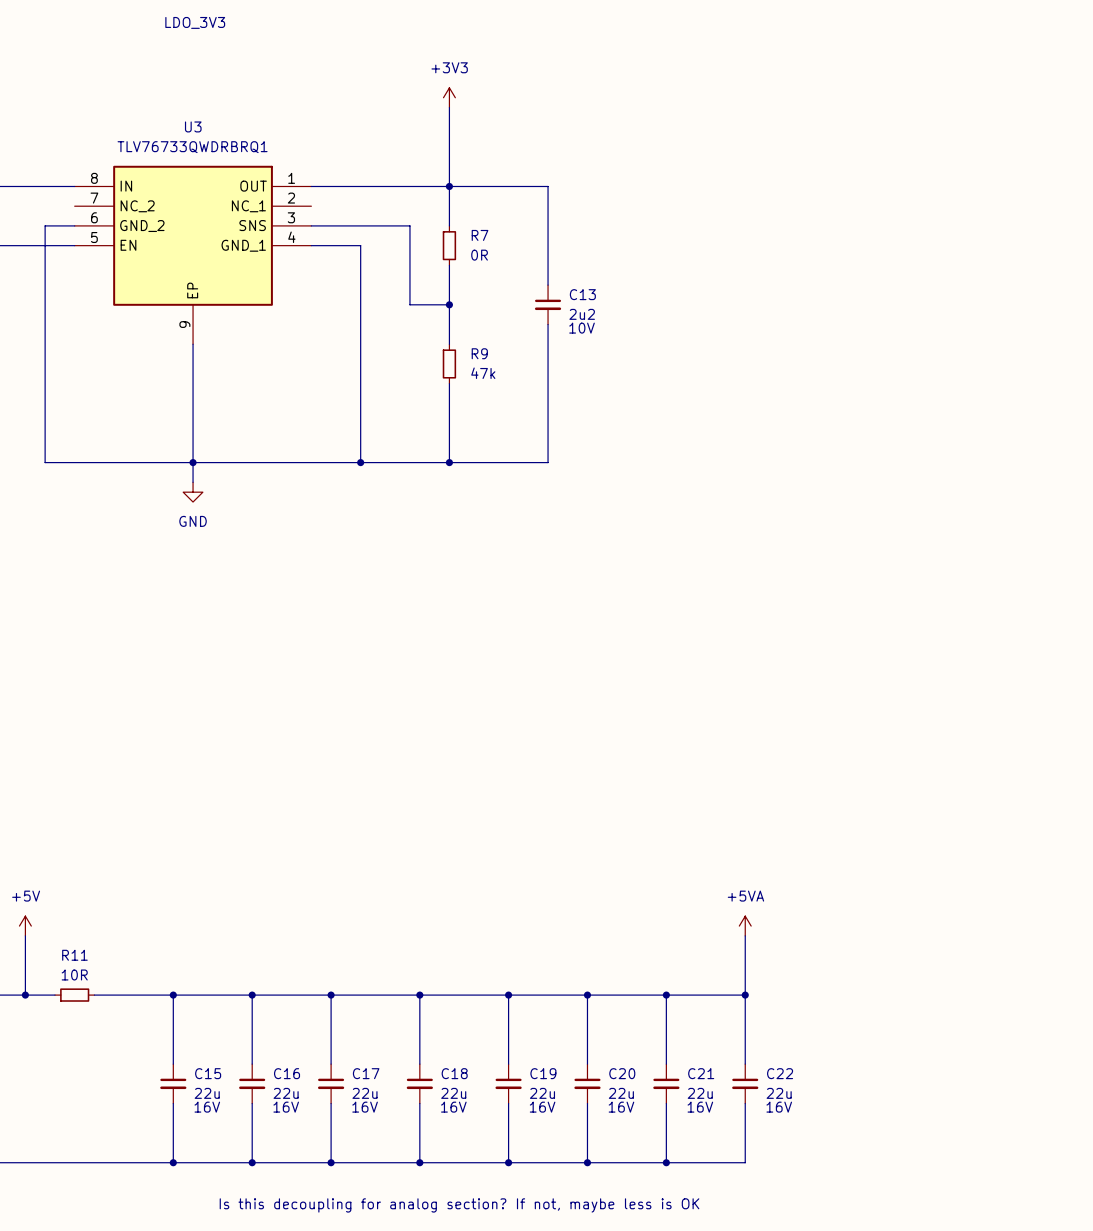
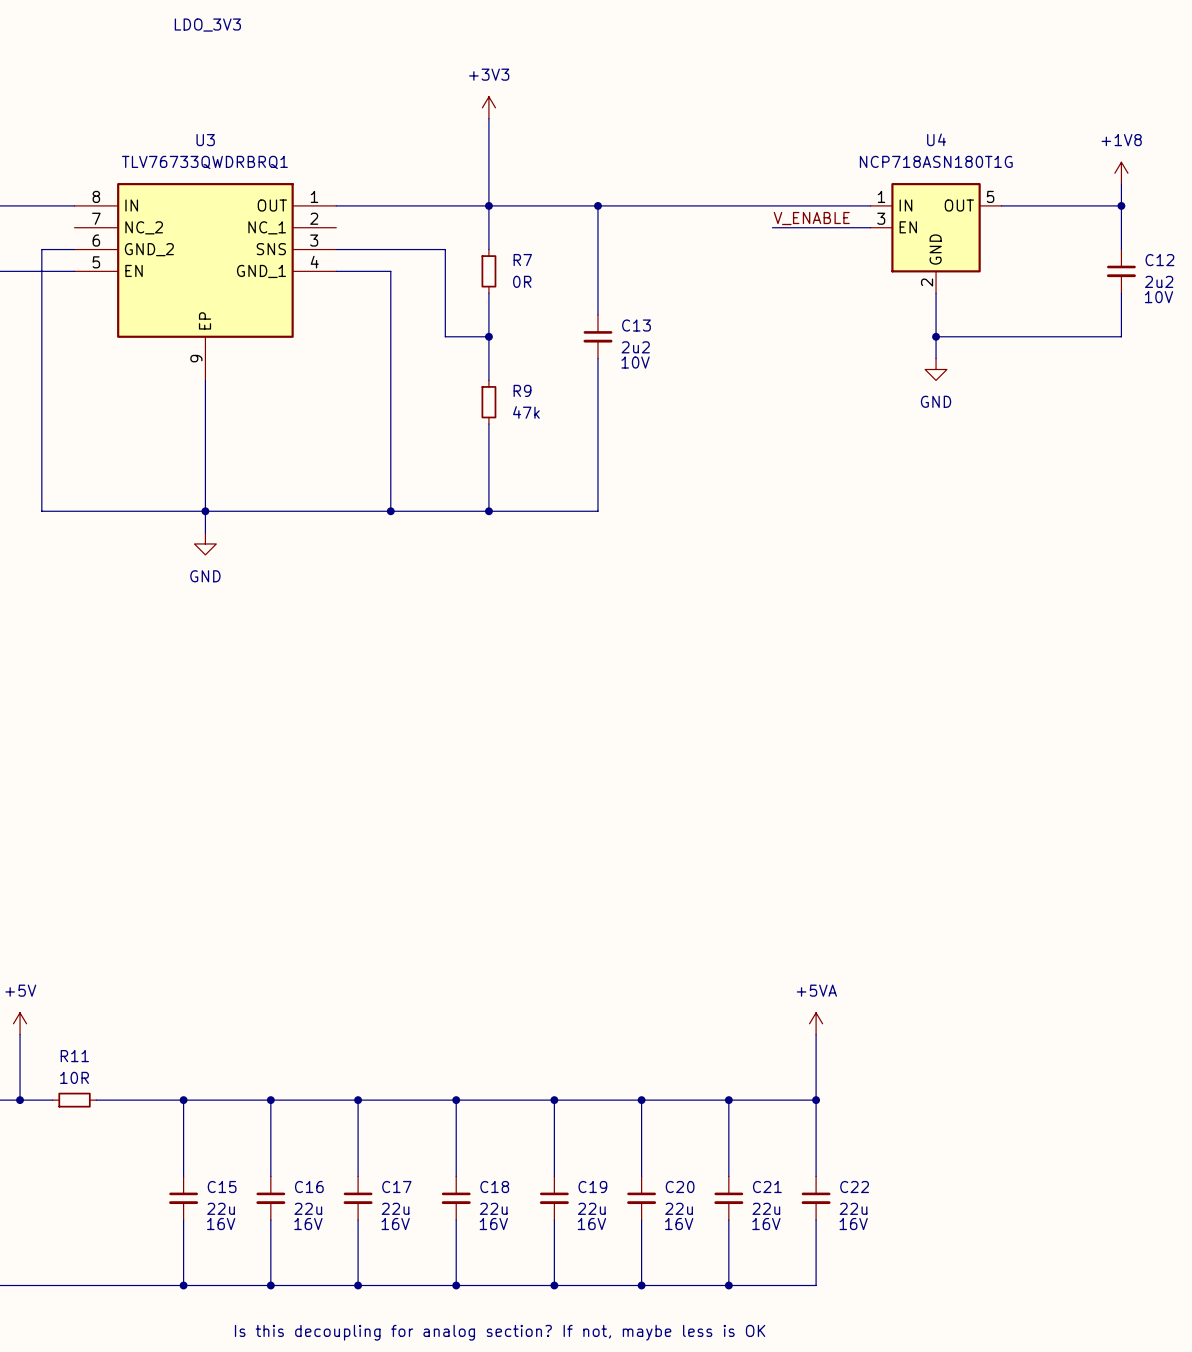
power symbol: none -> +1V8 (1121, 173)
wire: none -> (1121, 184) (1121, 249)
wire: none -> (597, 205) (870, 205)
junction: none -> (597, 205)
wire: none -> (1001, 205) (1121, 205)
junction: none -> (1121, 205)
label: none -> V_ENABLE (811, 218)
wire: none -> (772, 227) (870, 227)
U4: none -> NCP718ASN180T1G (936, 238)
C12: none -> 2u2 (1121, 271)
wire: none -> (936, 293) (936, 358)
wire: none -> (1121, 293) (1121, 336) (936, 336)
junction: none -> (936, 336)
power symbol: none -> GND (936, 369)

